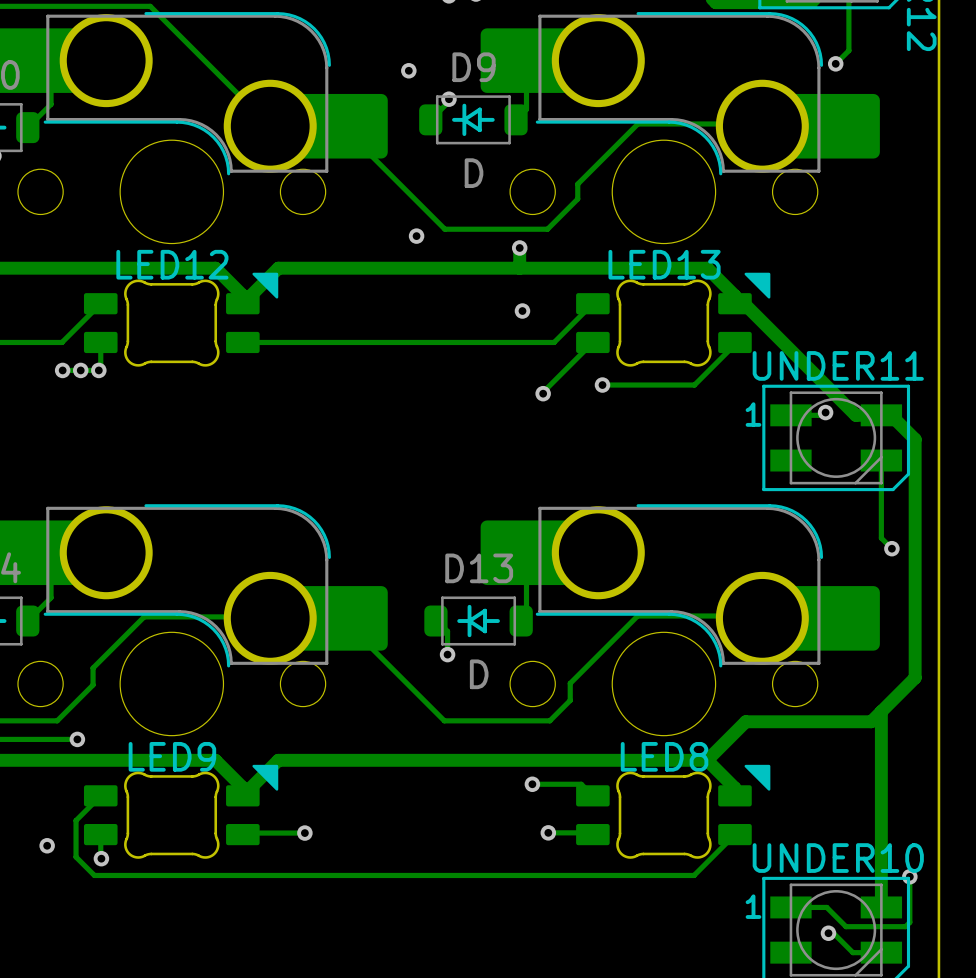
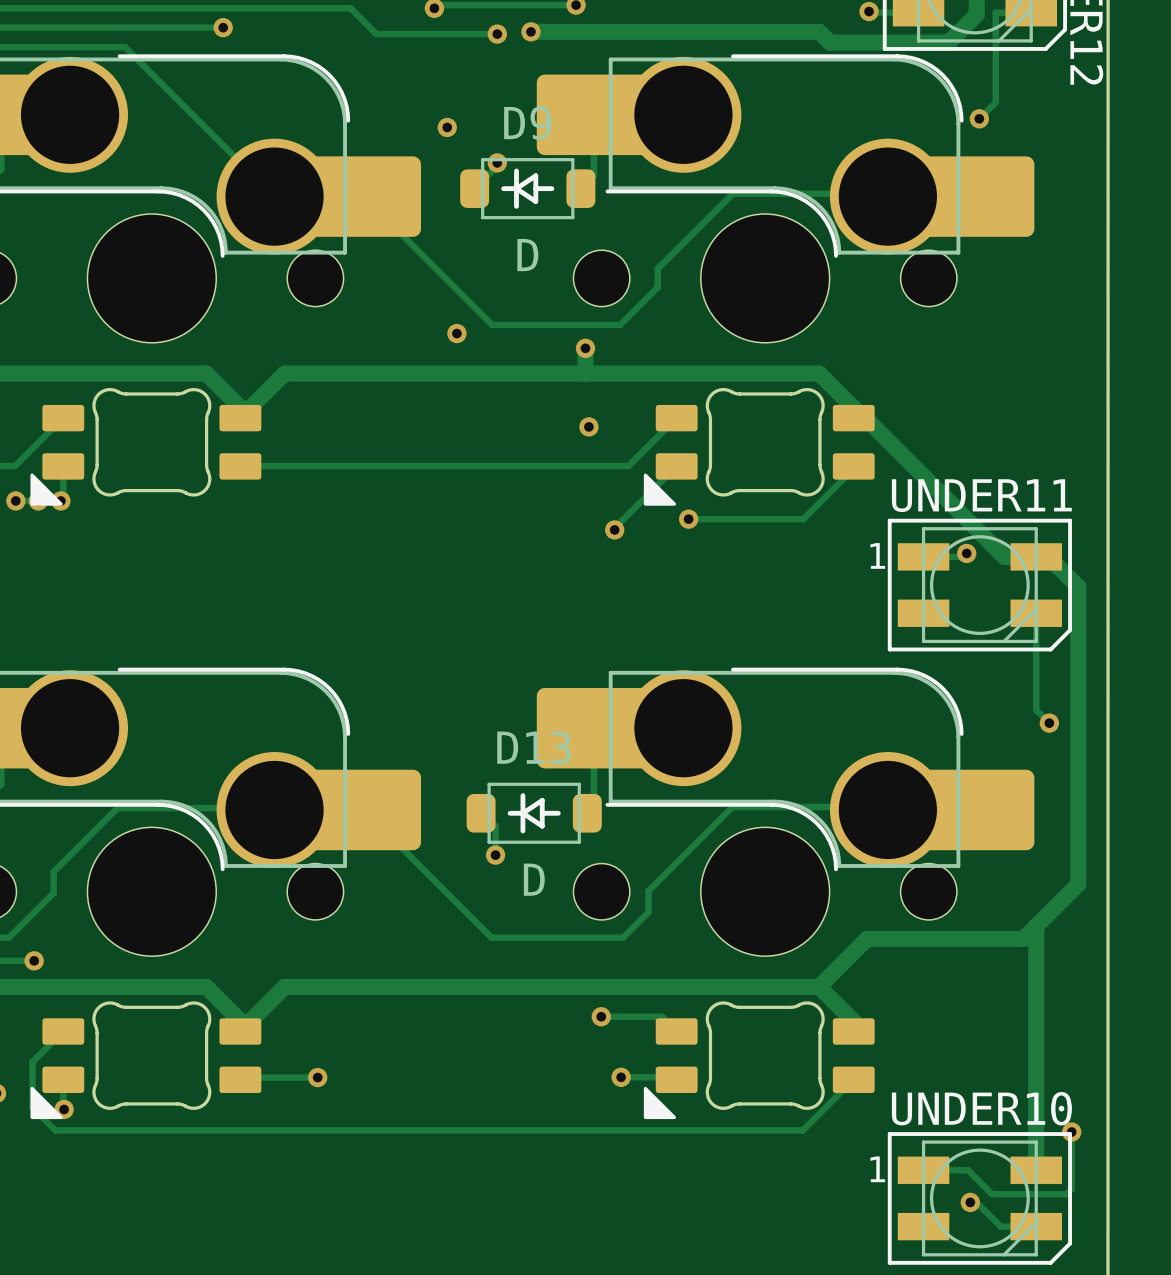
LED12: (181, 319) -> none
LED13: (673, 319) -> none
part: none -> (145, 446)
part: none -> (759, 446)
LED9: (181, 811) -> none
LED8: (673, 811) -> none
part: none -> (145, 1060)
part: none -> (759, 1060)

